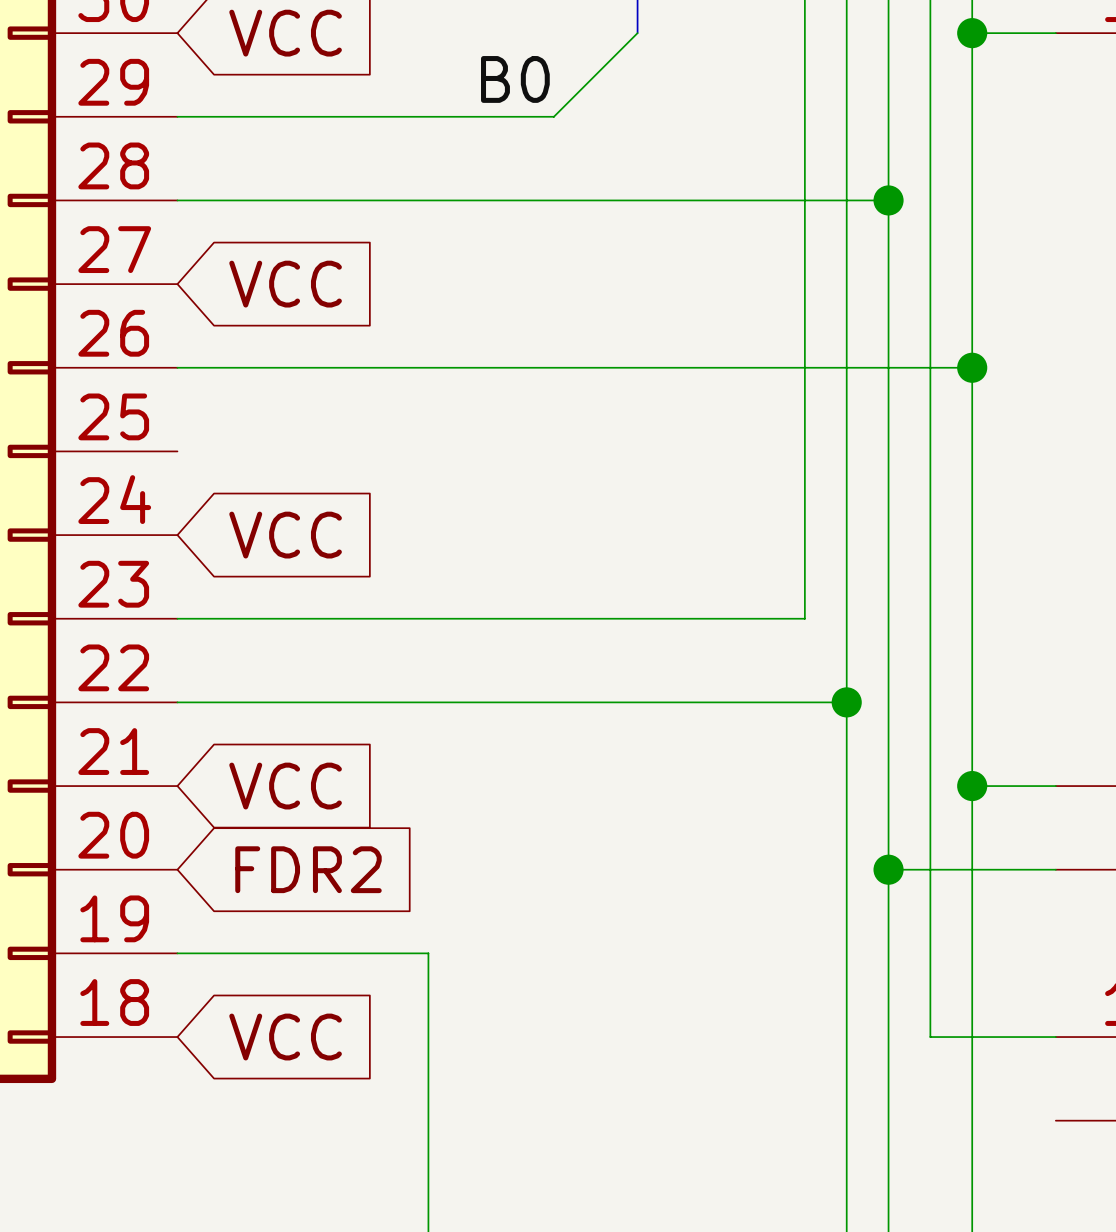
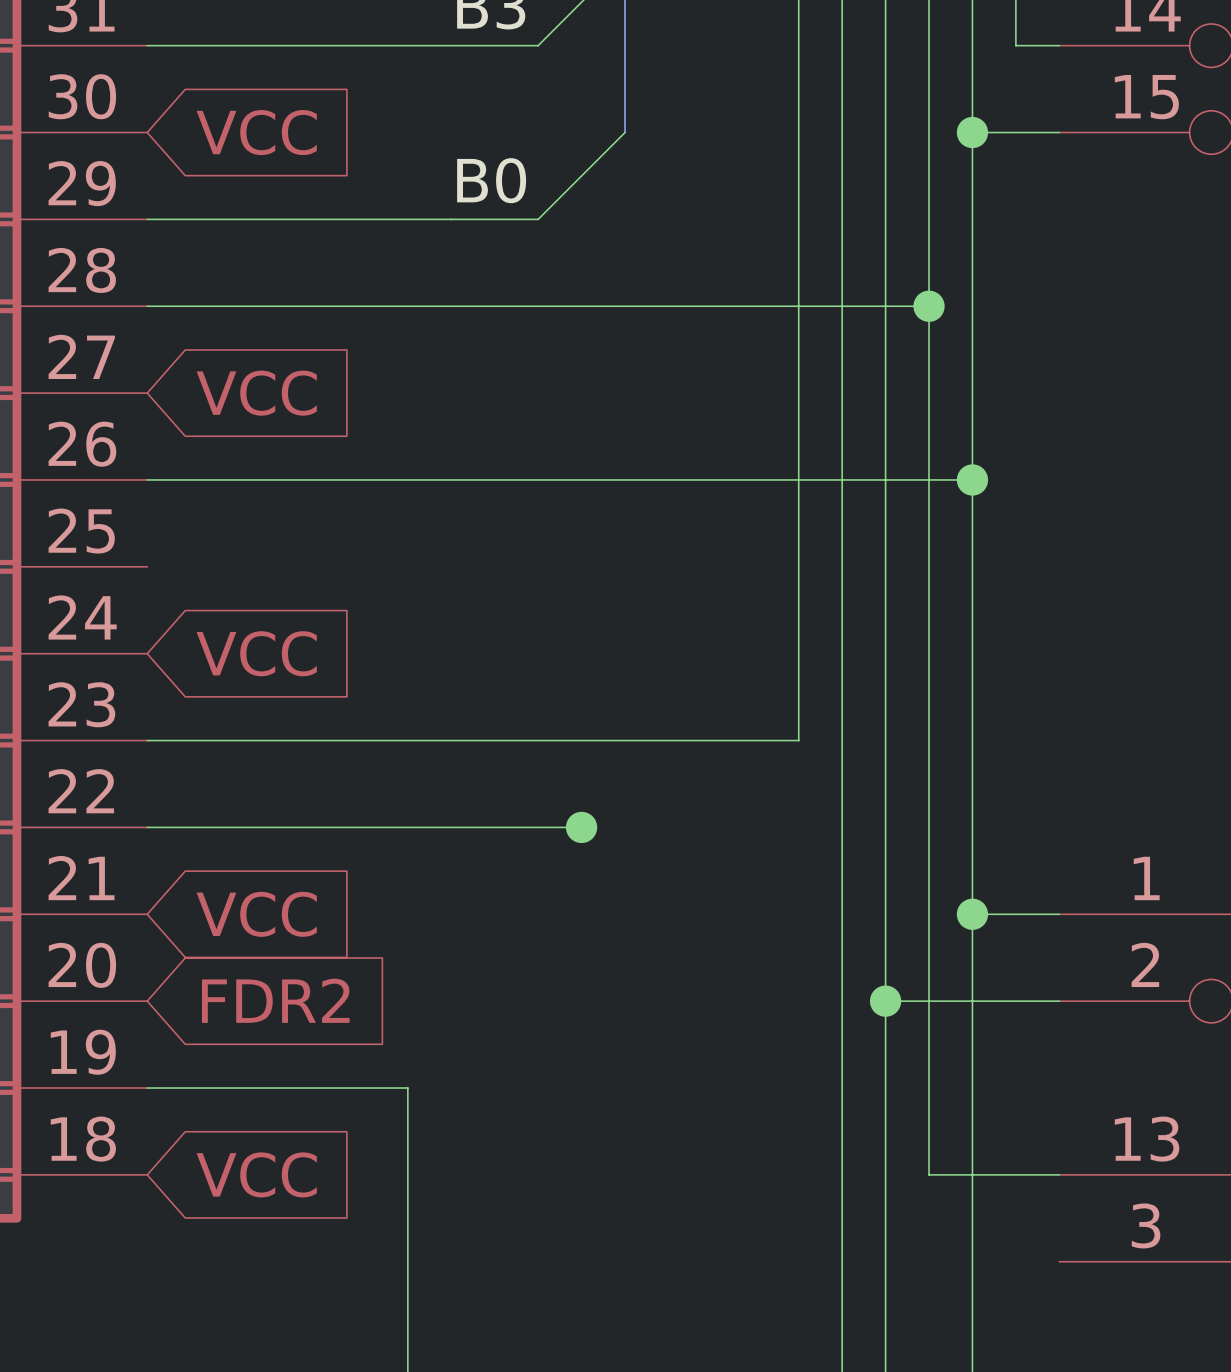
wire: none -> (885, 306) (929, 306)
junction position: (888, 200) -> (929, 306)
wire: (595, 702) (846, 702) -> none
junction: none -> (581, 827)
junction: (846, 702) -> none

